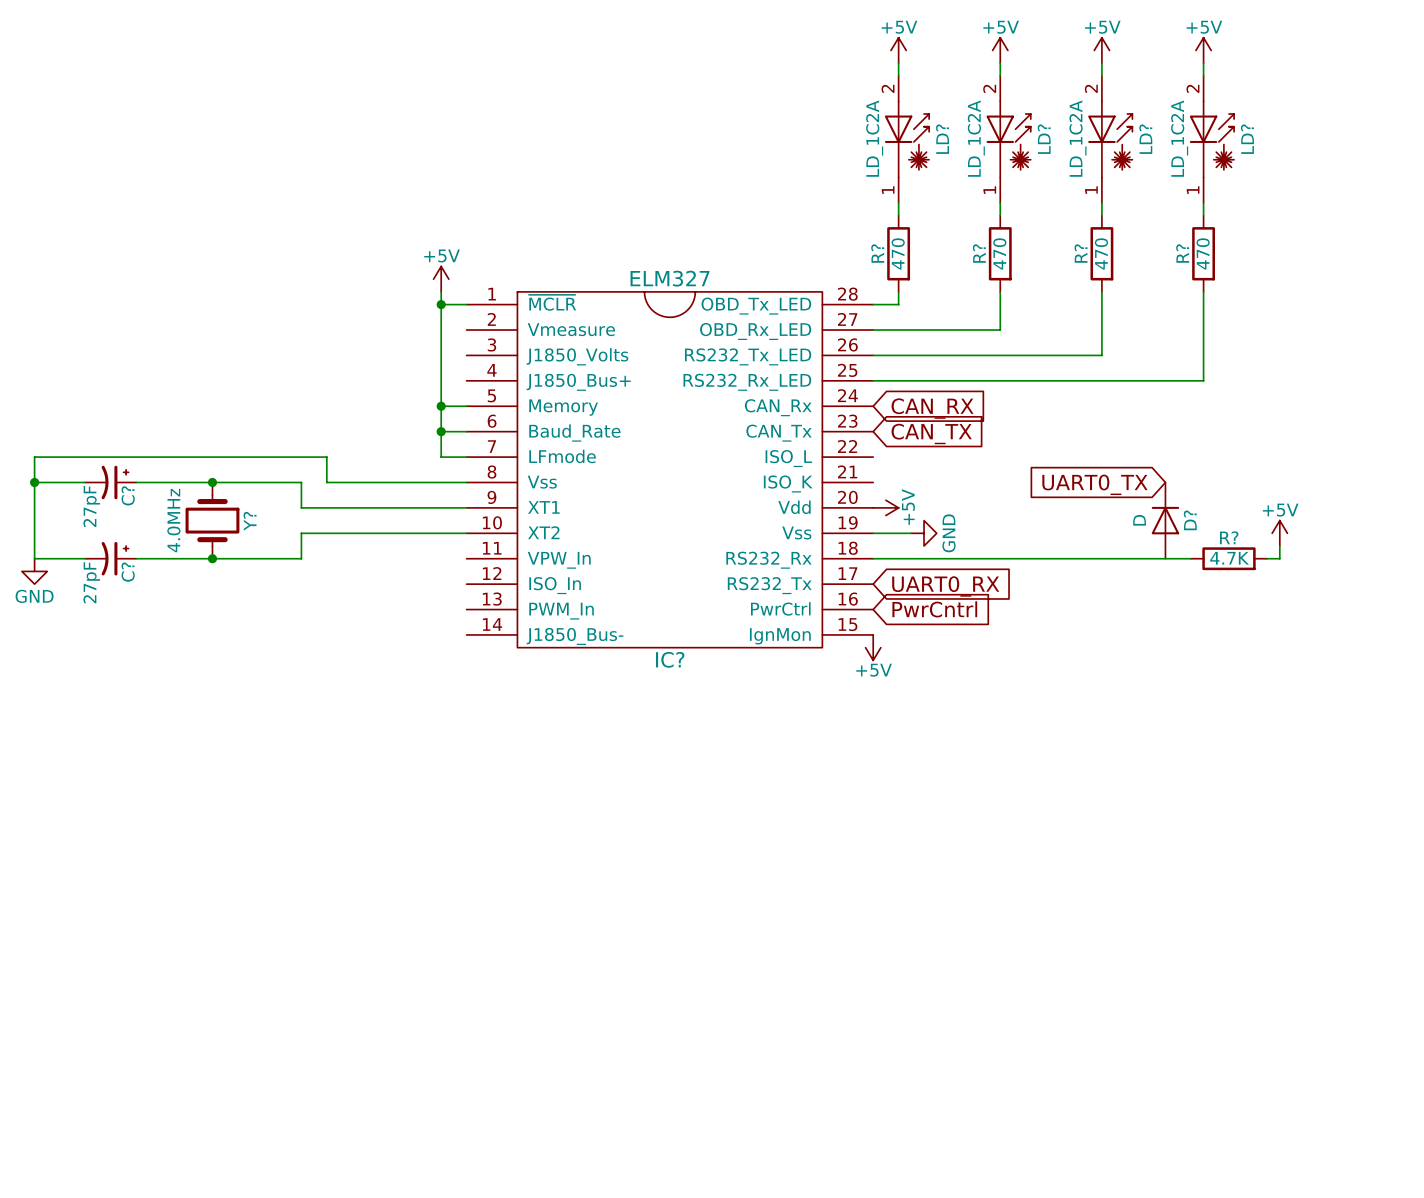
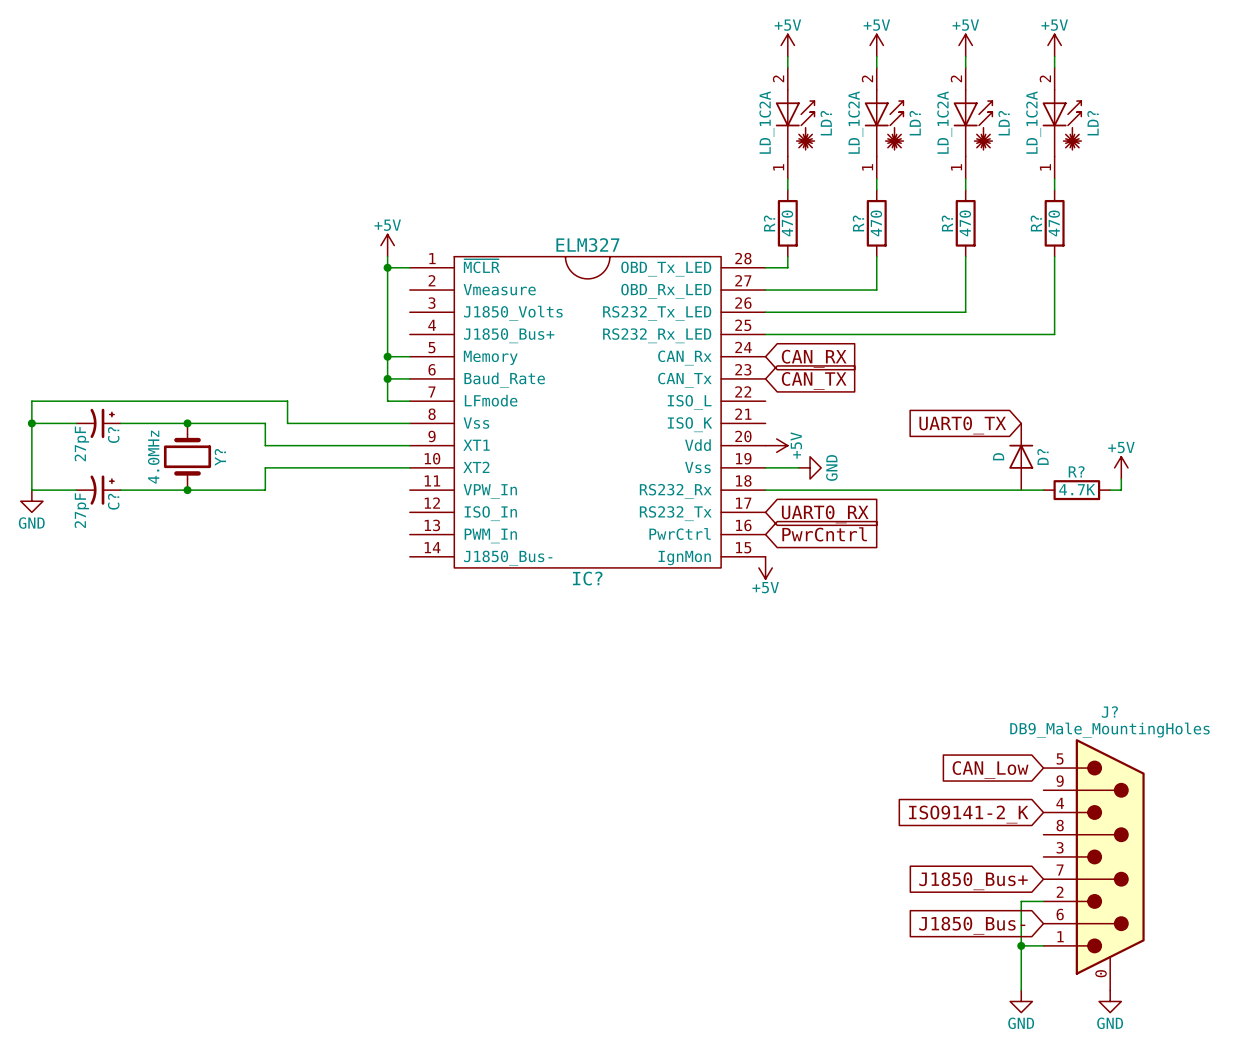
global label: none -> CAN_Low (990, 770)
global label: none -> ISO9141-2_K (968, 814)
J?: none -> DB9_Male_MountingHoles (1094, 864)
global label: none -> J1850_Bus+ (973, 881)
wire: none -> (1043, 901) (1021, 901) (1021, 990)
global label: none -> J1850_Bus- (972, 925)
wire: none -> (1021, 945) (1043, 945)
junction: none -> (1021, 945)
power symbol: none -> GND (1021, 1001)
power symbol: none -> GND (1110, 1001)

